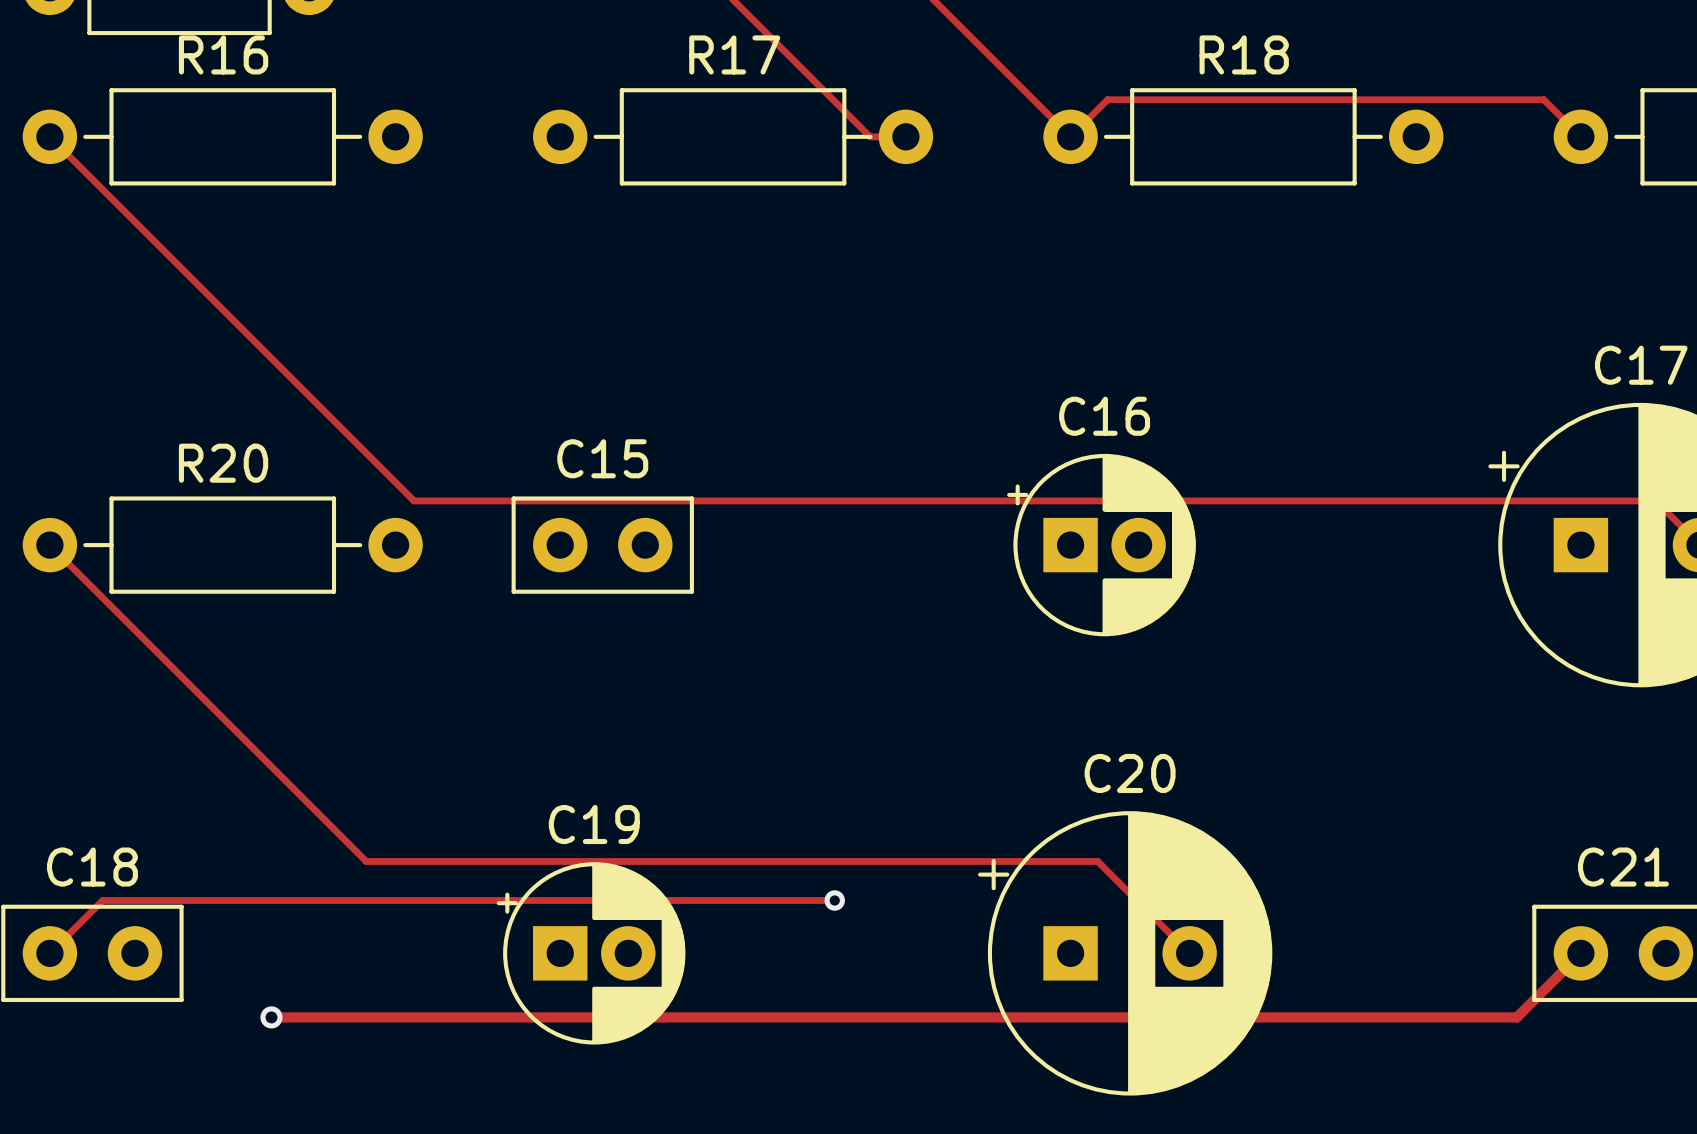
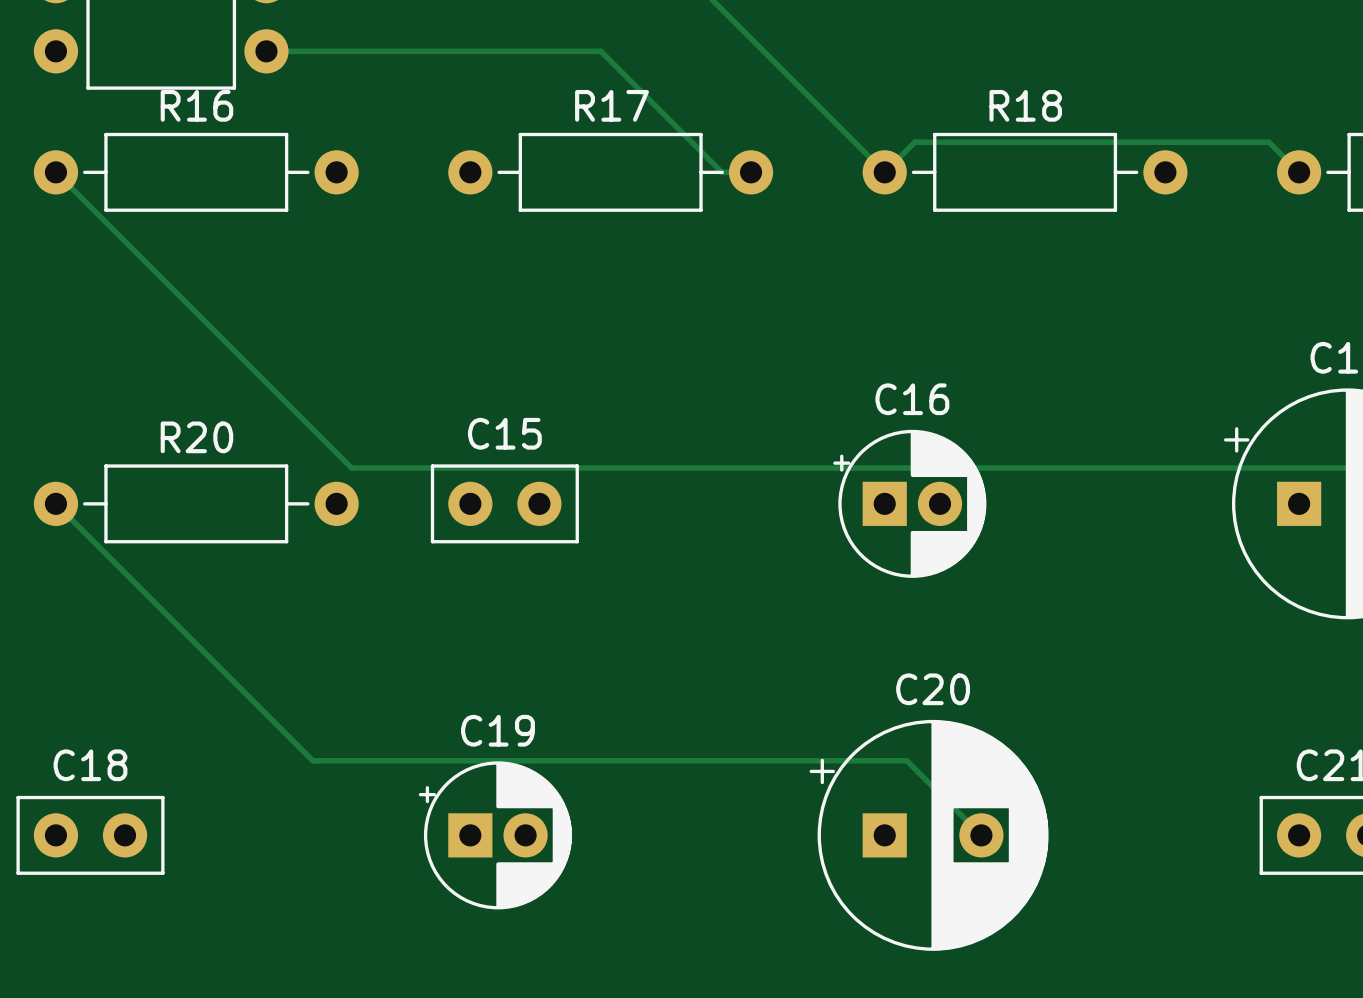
track: (834, 900) (102, 900) (49, 953) -> none
via: (834, 900) -> none
track: (1580, 953) (1516, 1017) (271, 1017) -> none
via: (271, 1017) -> none

